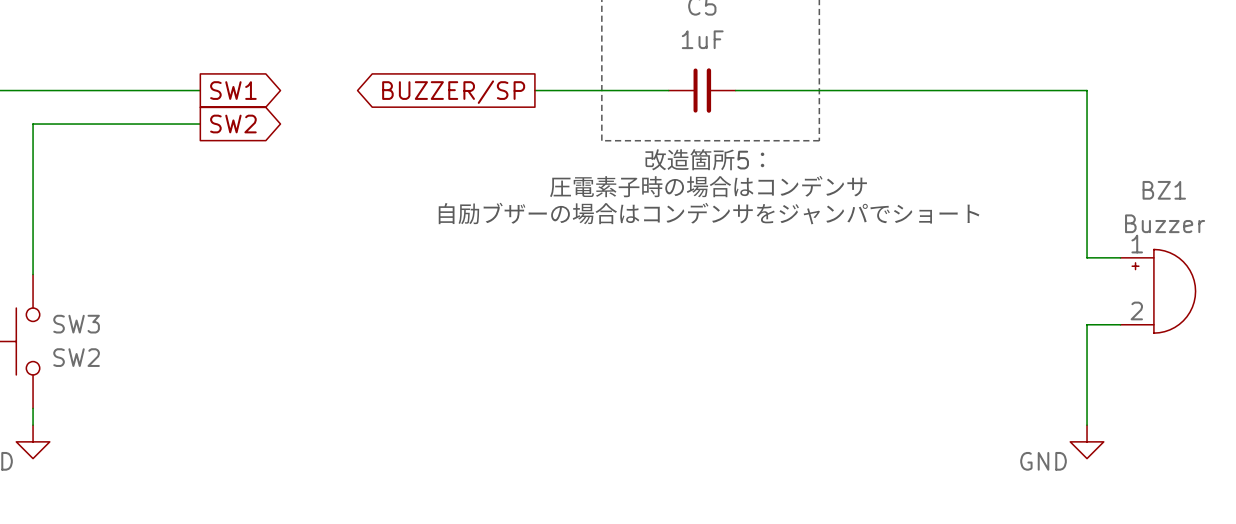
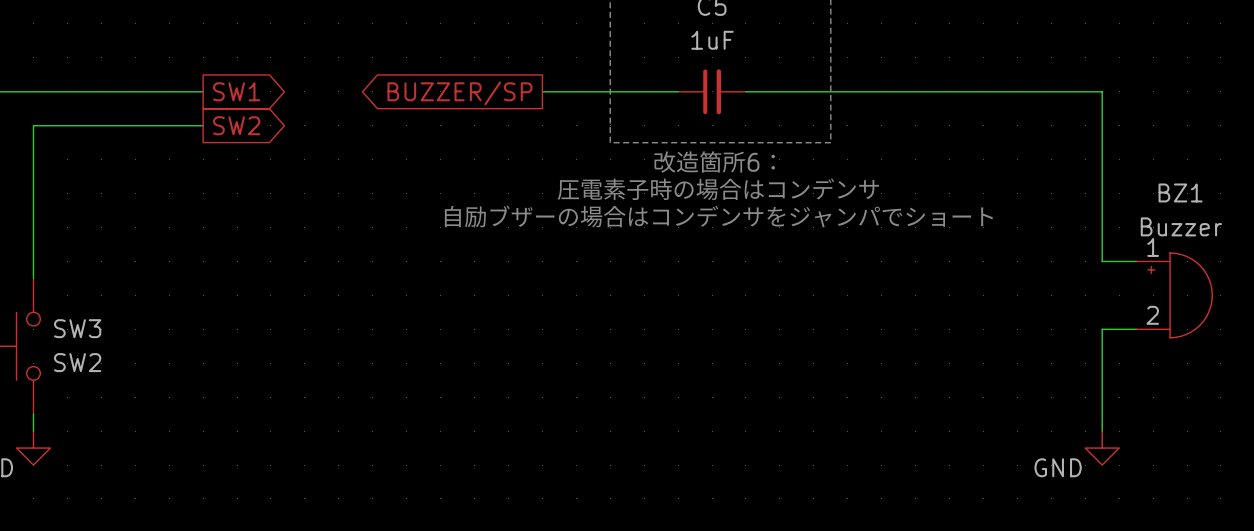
text: 改造箇所5： (704, 159) -> 改造箇所6： (714, 161)

